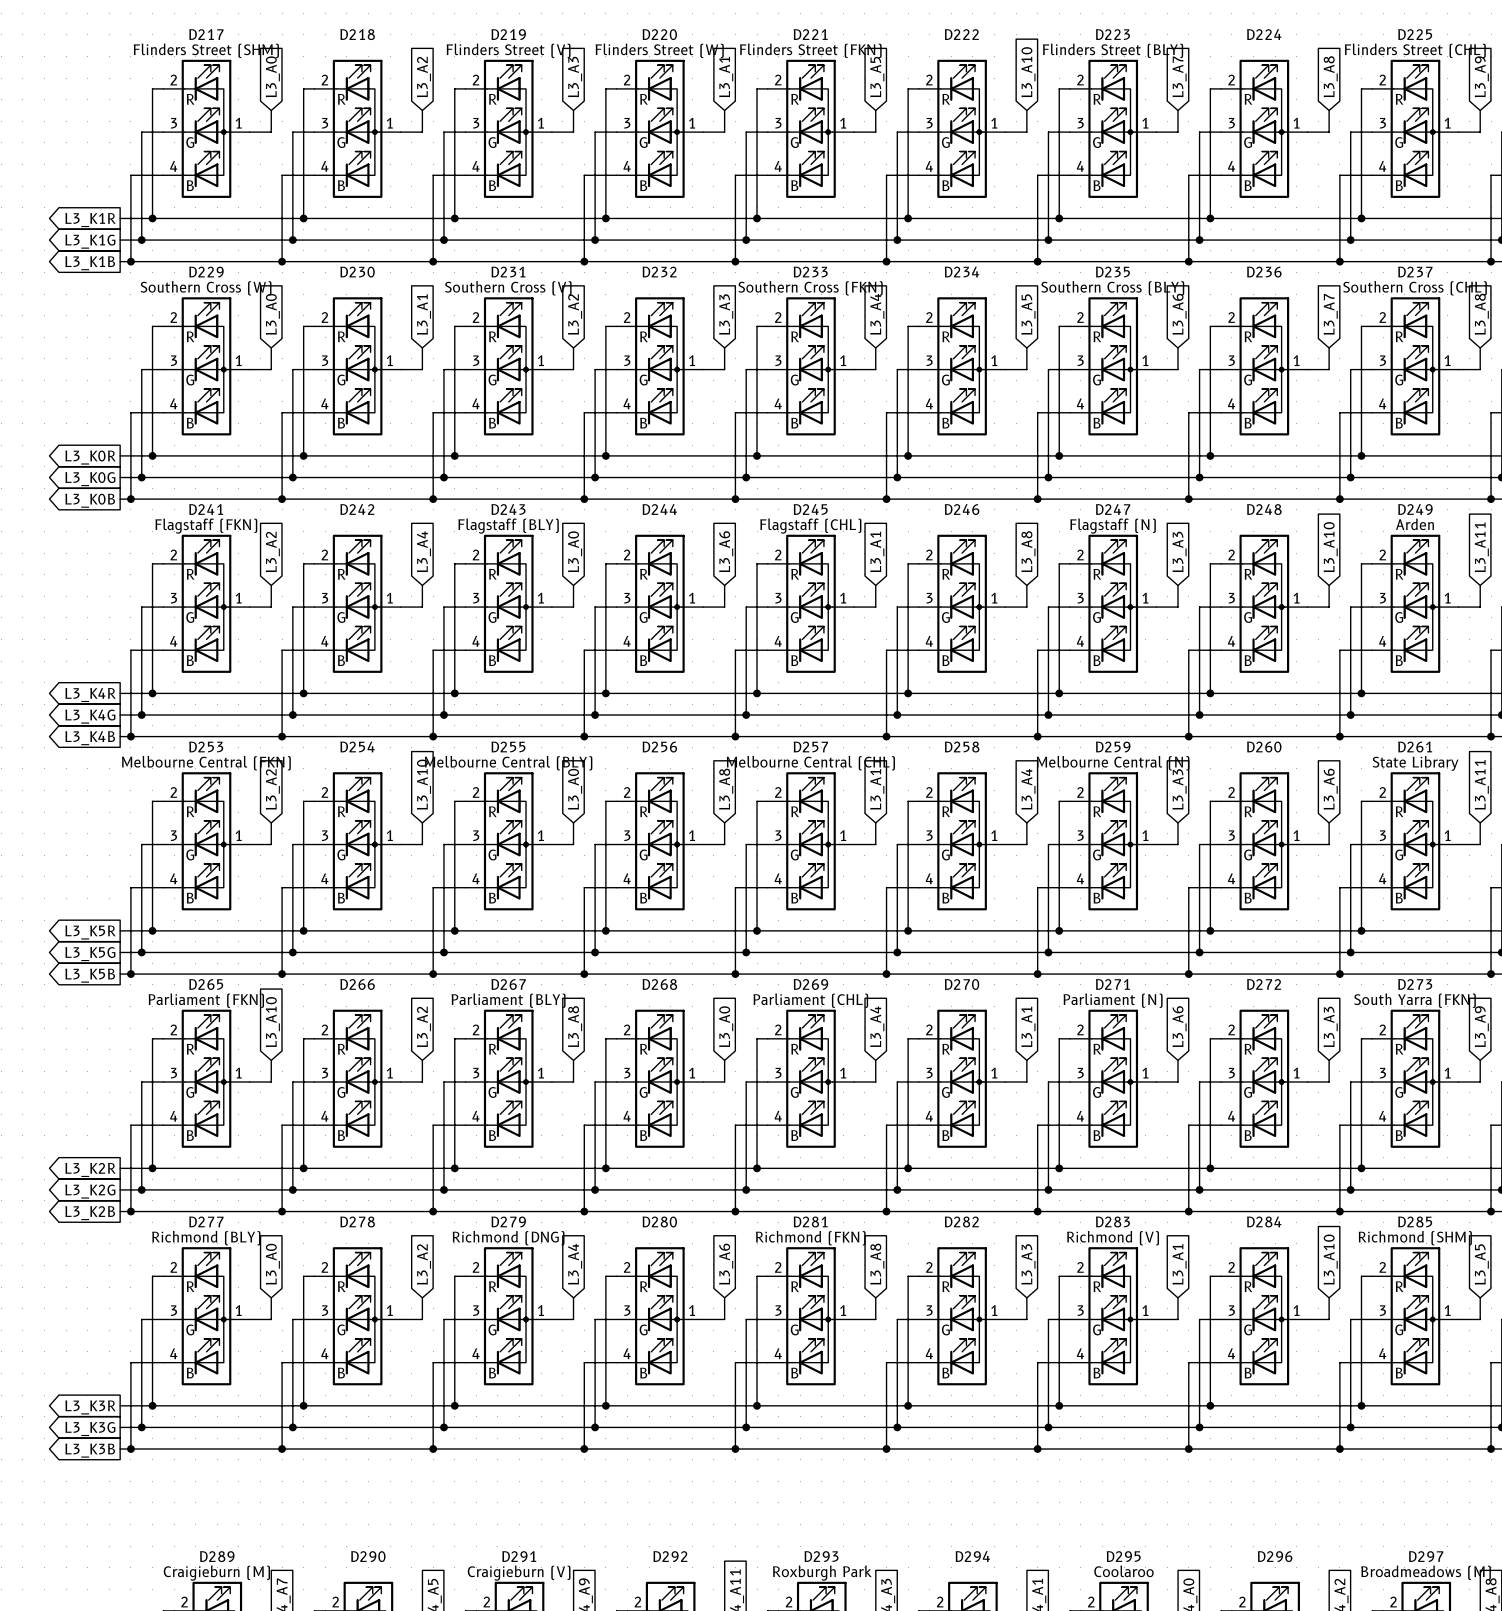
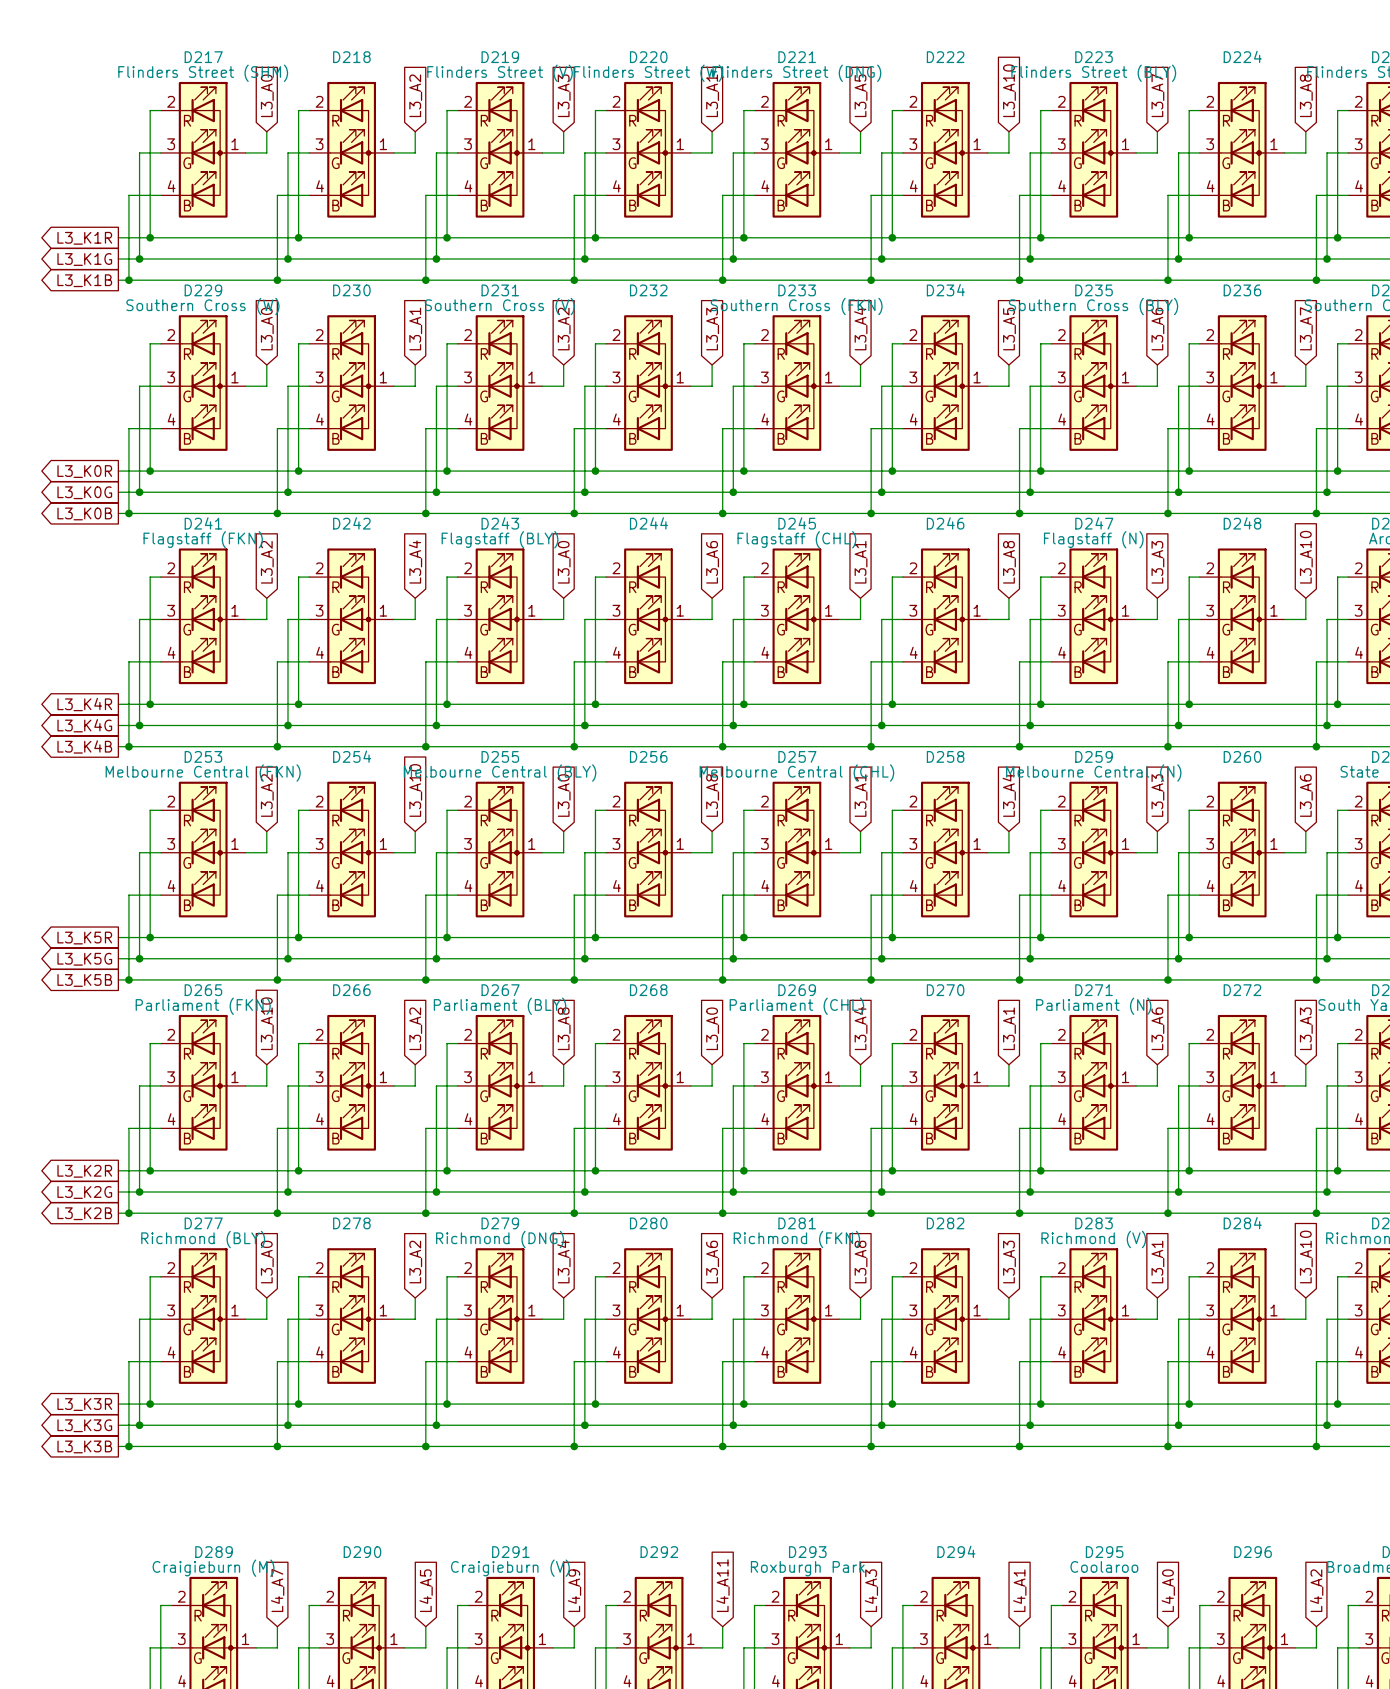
D221 text: Flinders Street (FKN) (810, 50) -> Flinders Street (DNG) (796, 73)

